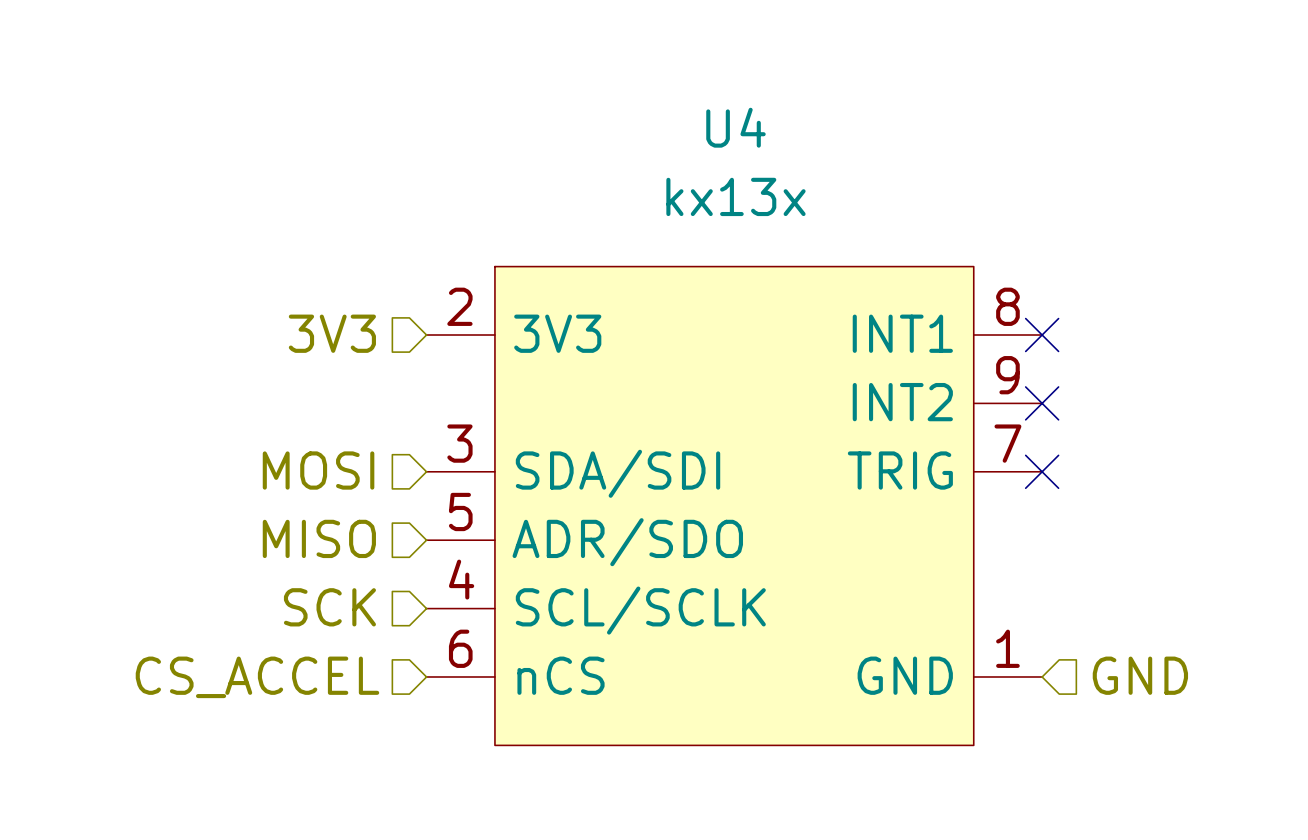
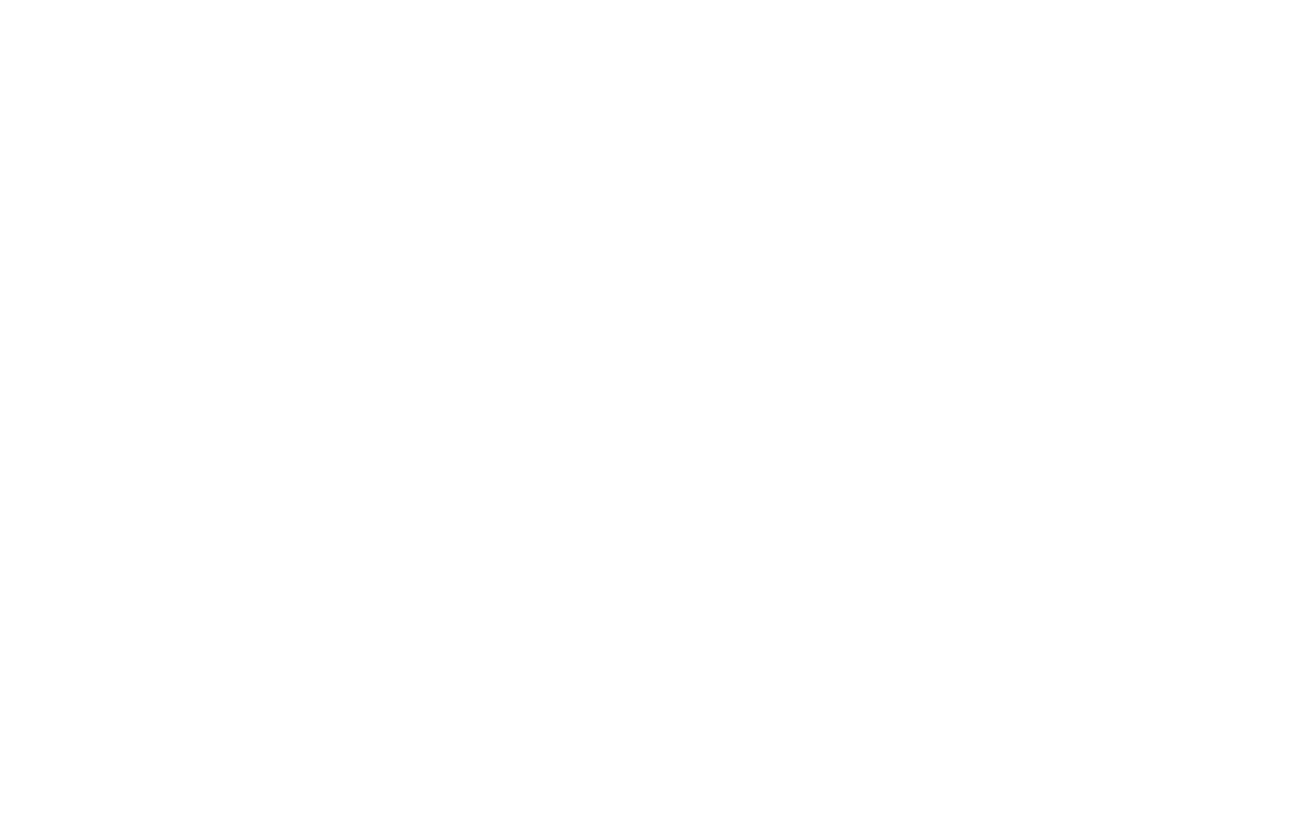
hierarchical label: 3V3 (332, 333) -> none
no-connect mark: (1042, 335) -> none
no-connect mark: (1042, 403) -> none
hierarchical label: MOSI (318, 470) -> none
no-connect mark: (1042, 471) -> none
U4: kx13x (734, 505) -> none
hierarchical label: MISO (319, 538) -> none
hierarchical label: SCK (329, 607) -> none
hierarchical label: GND (1140, 675) -> none
hierarchical label: CS_ACCEL (257, 677) -> none

